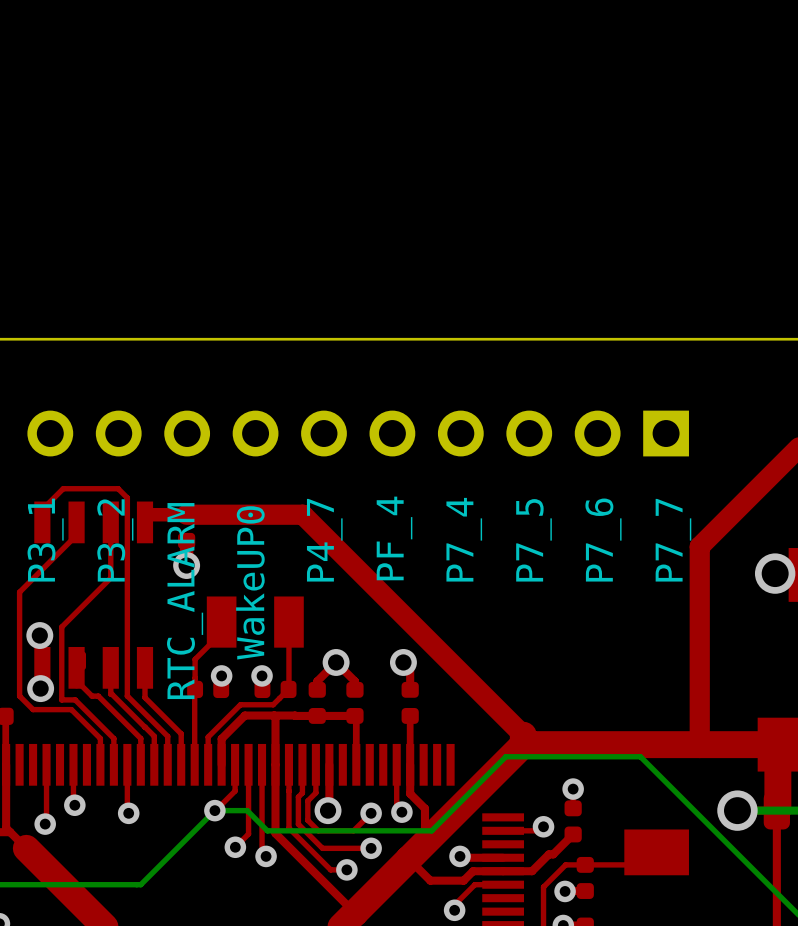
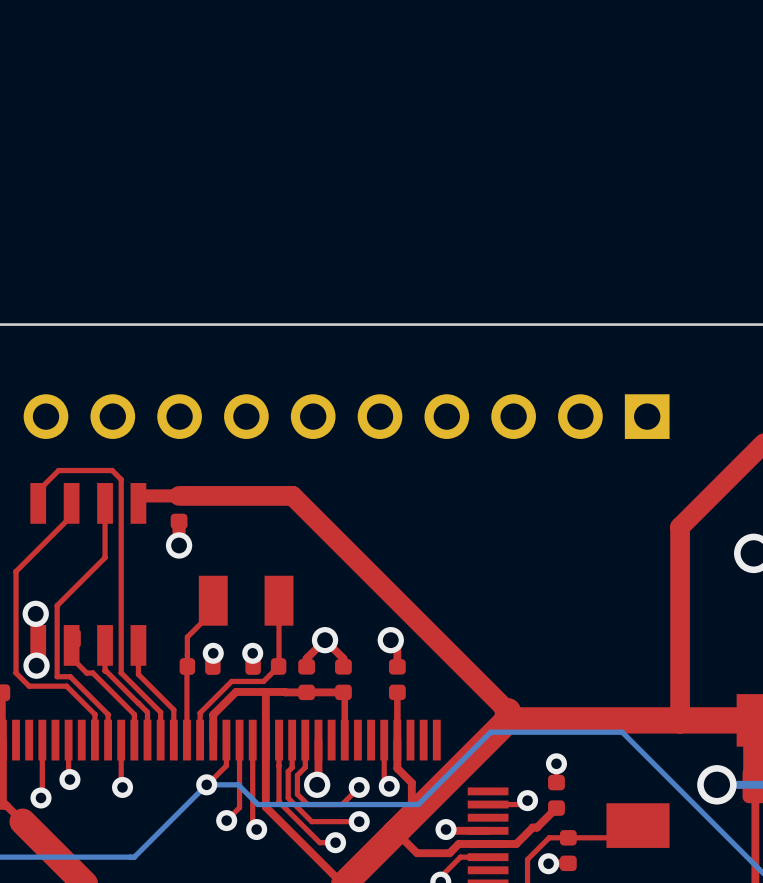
text: PF_4 (394, 538) -> none
text: P7_4 (464, 539) -> none
text: P3_1 (45, 540) -> none
text: P3_2 (115, 540) -> none
text: P4_7 (324, 540) -> none
text: P7_5 (534, 540) -> none
text: P7_6 (603, 540) -> none
text: P7_7 (673, 540) -> none
text: WakeUP0 (250, 582) -> none
text: RTC_ALARM (185, 601) -> none

